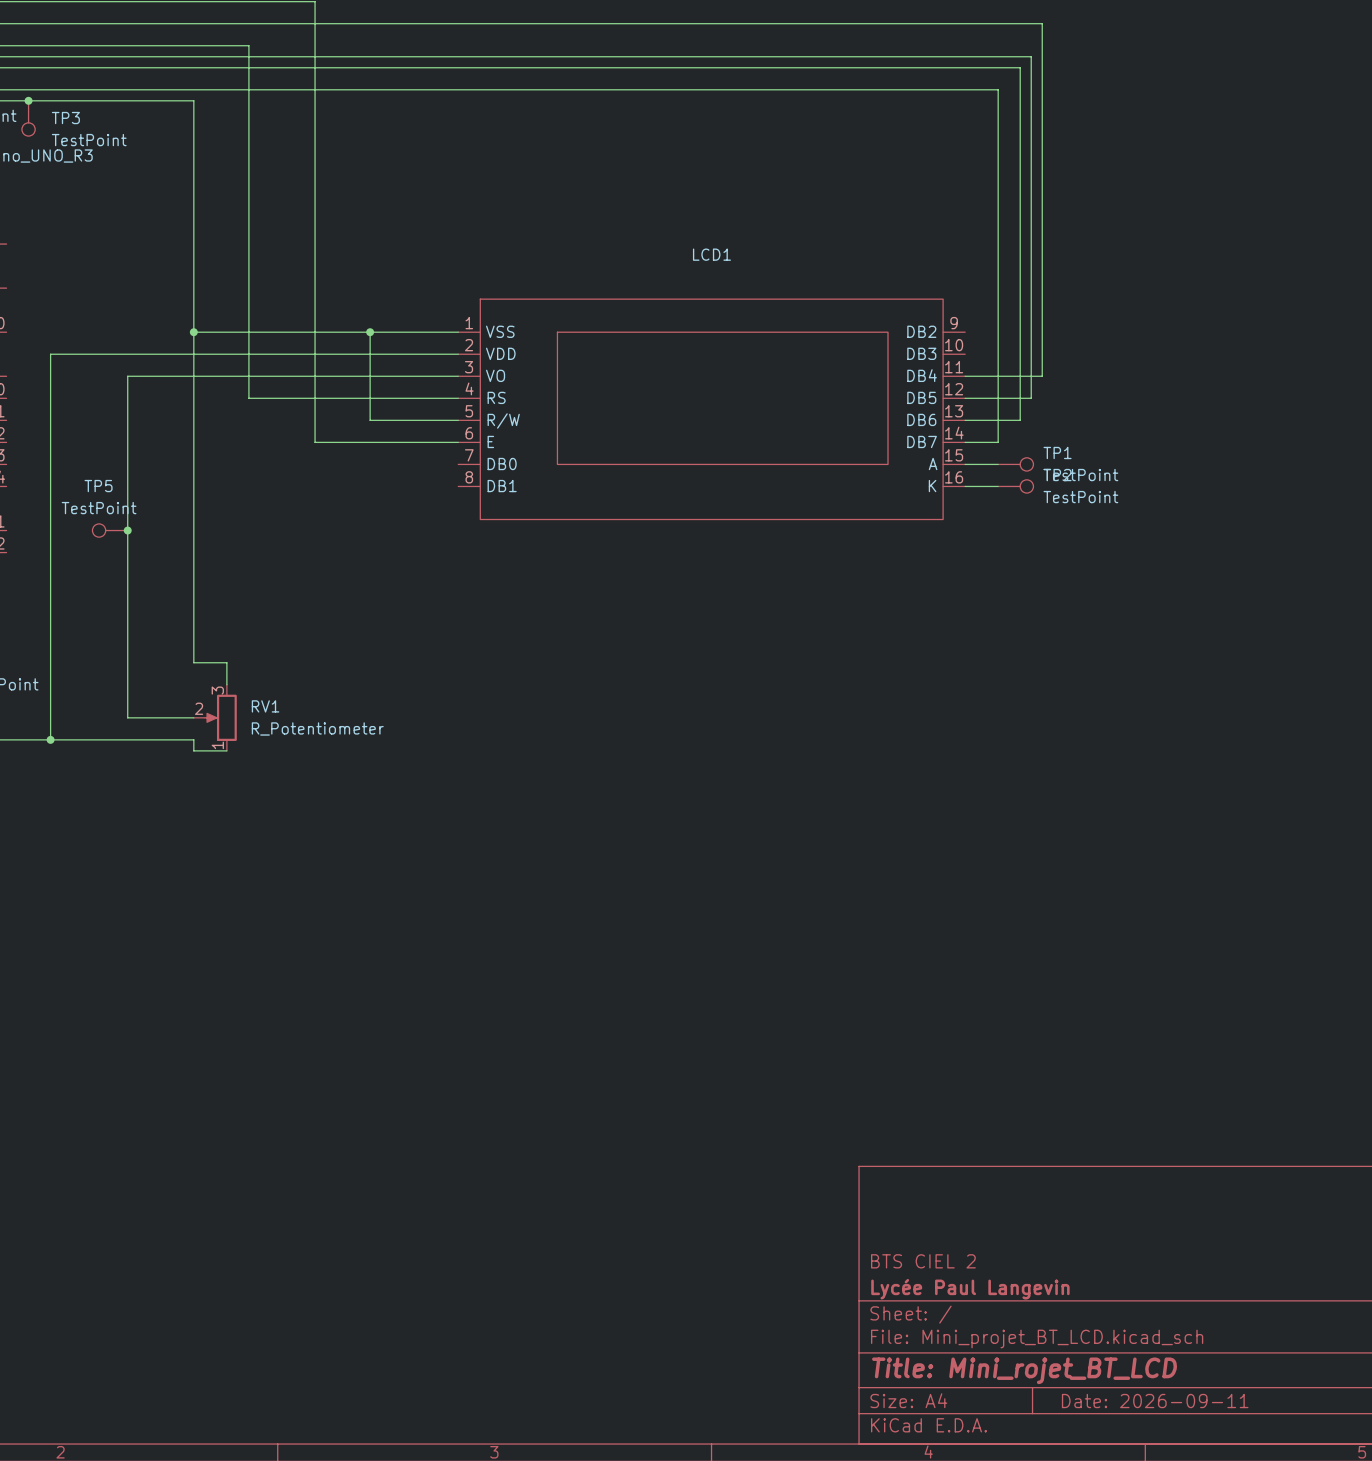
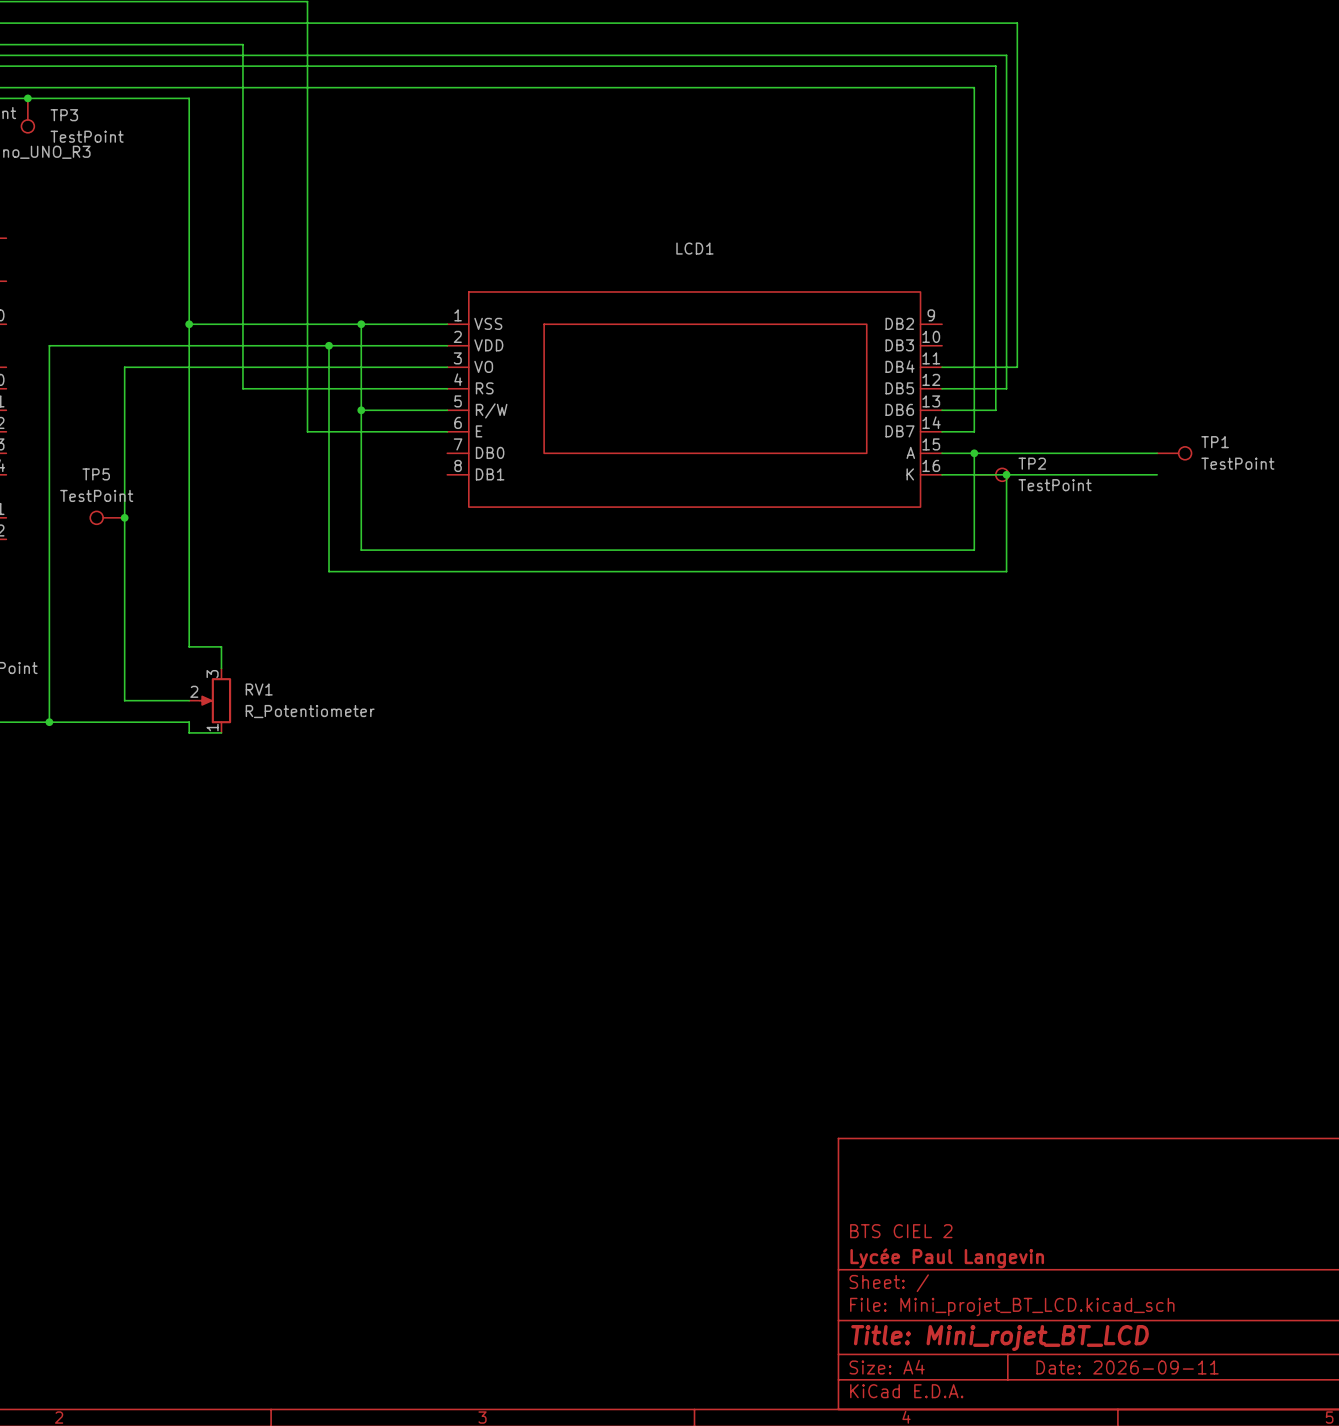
wire: none -> (329, 345) (329, 571) (1006, 571) (1006, 474)
junction: none -> (329, 345)
wire: none -> (361, 410) (361, 550) (974, 550) (974, 453) (1157, 453)
junction: none -> (361, 410)
junction: none -> (974, 453)
TP1 position: (1015, 464) -> (1174, 453)
wire: none -> (974, 474) (1157, 474)
junction: none -> (1006, 474)

